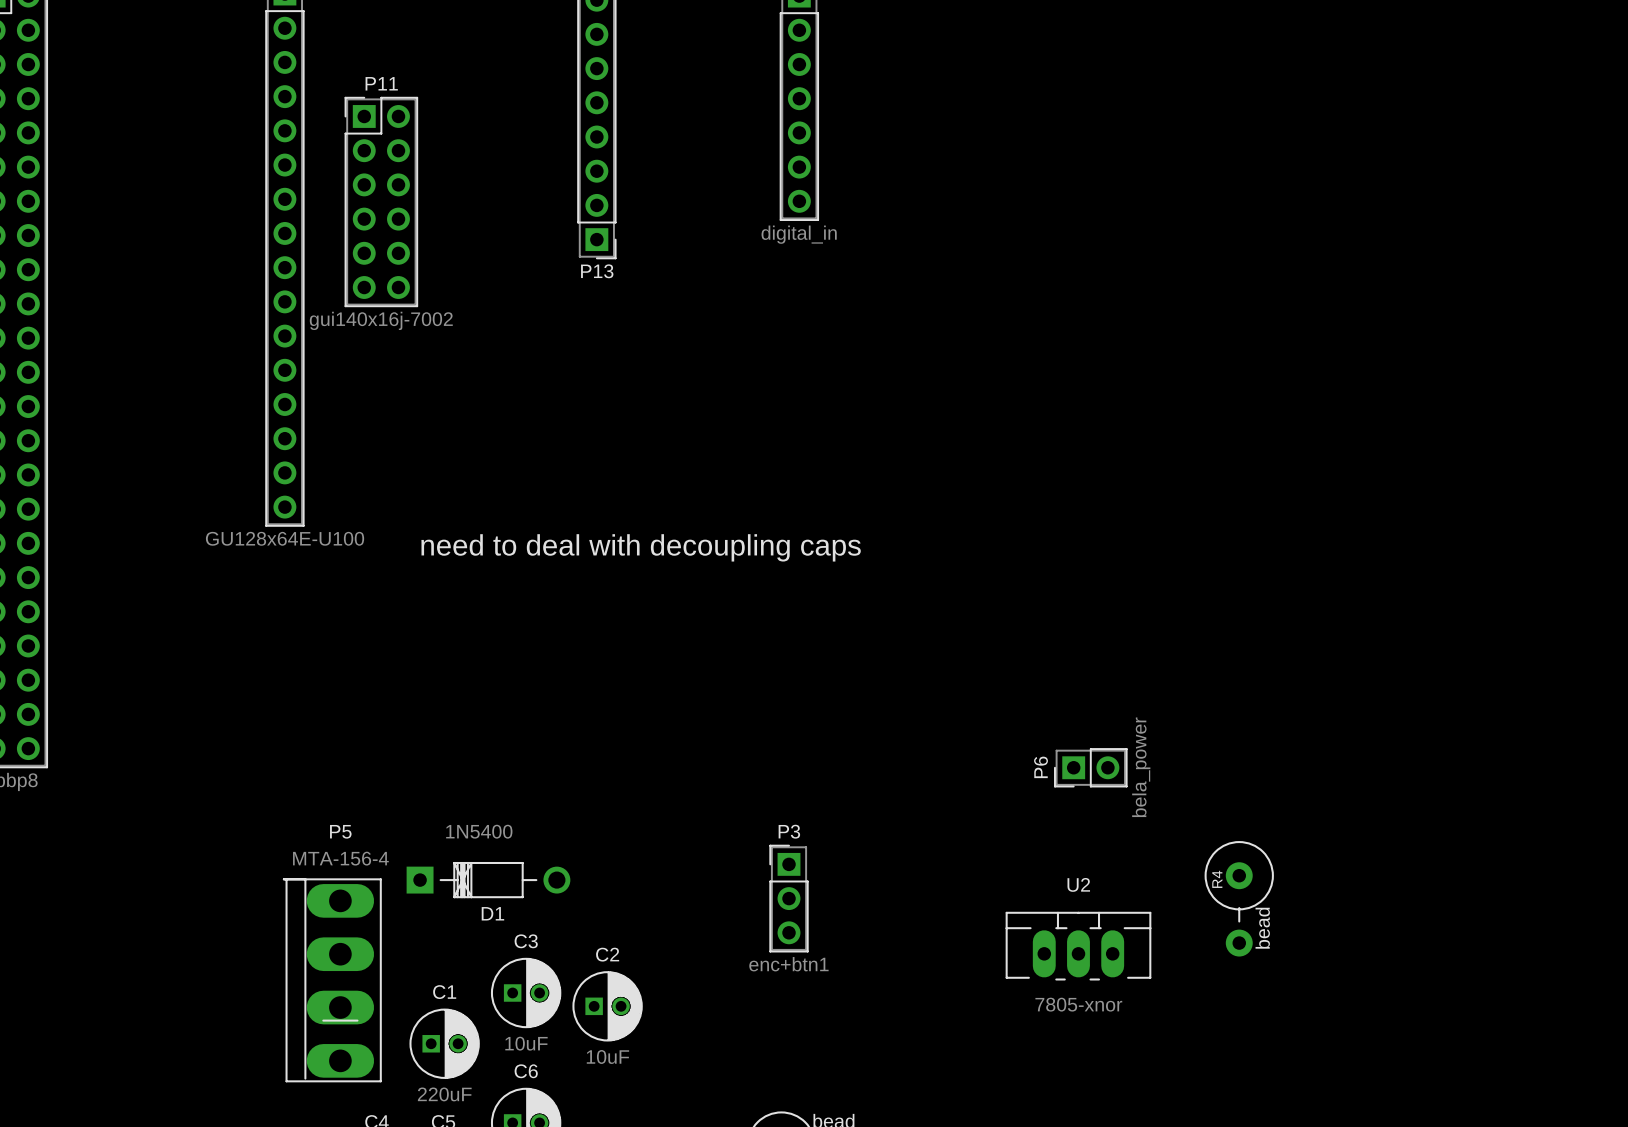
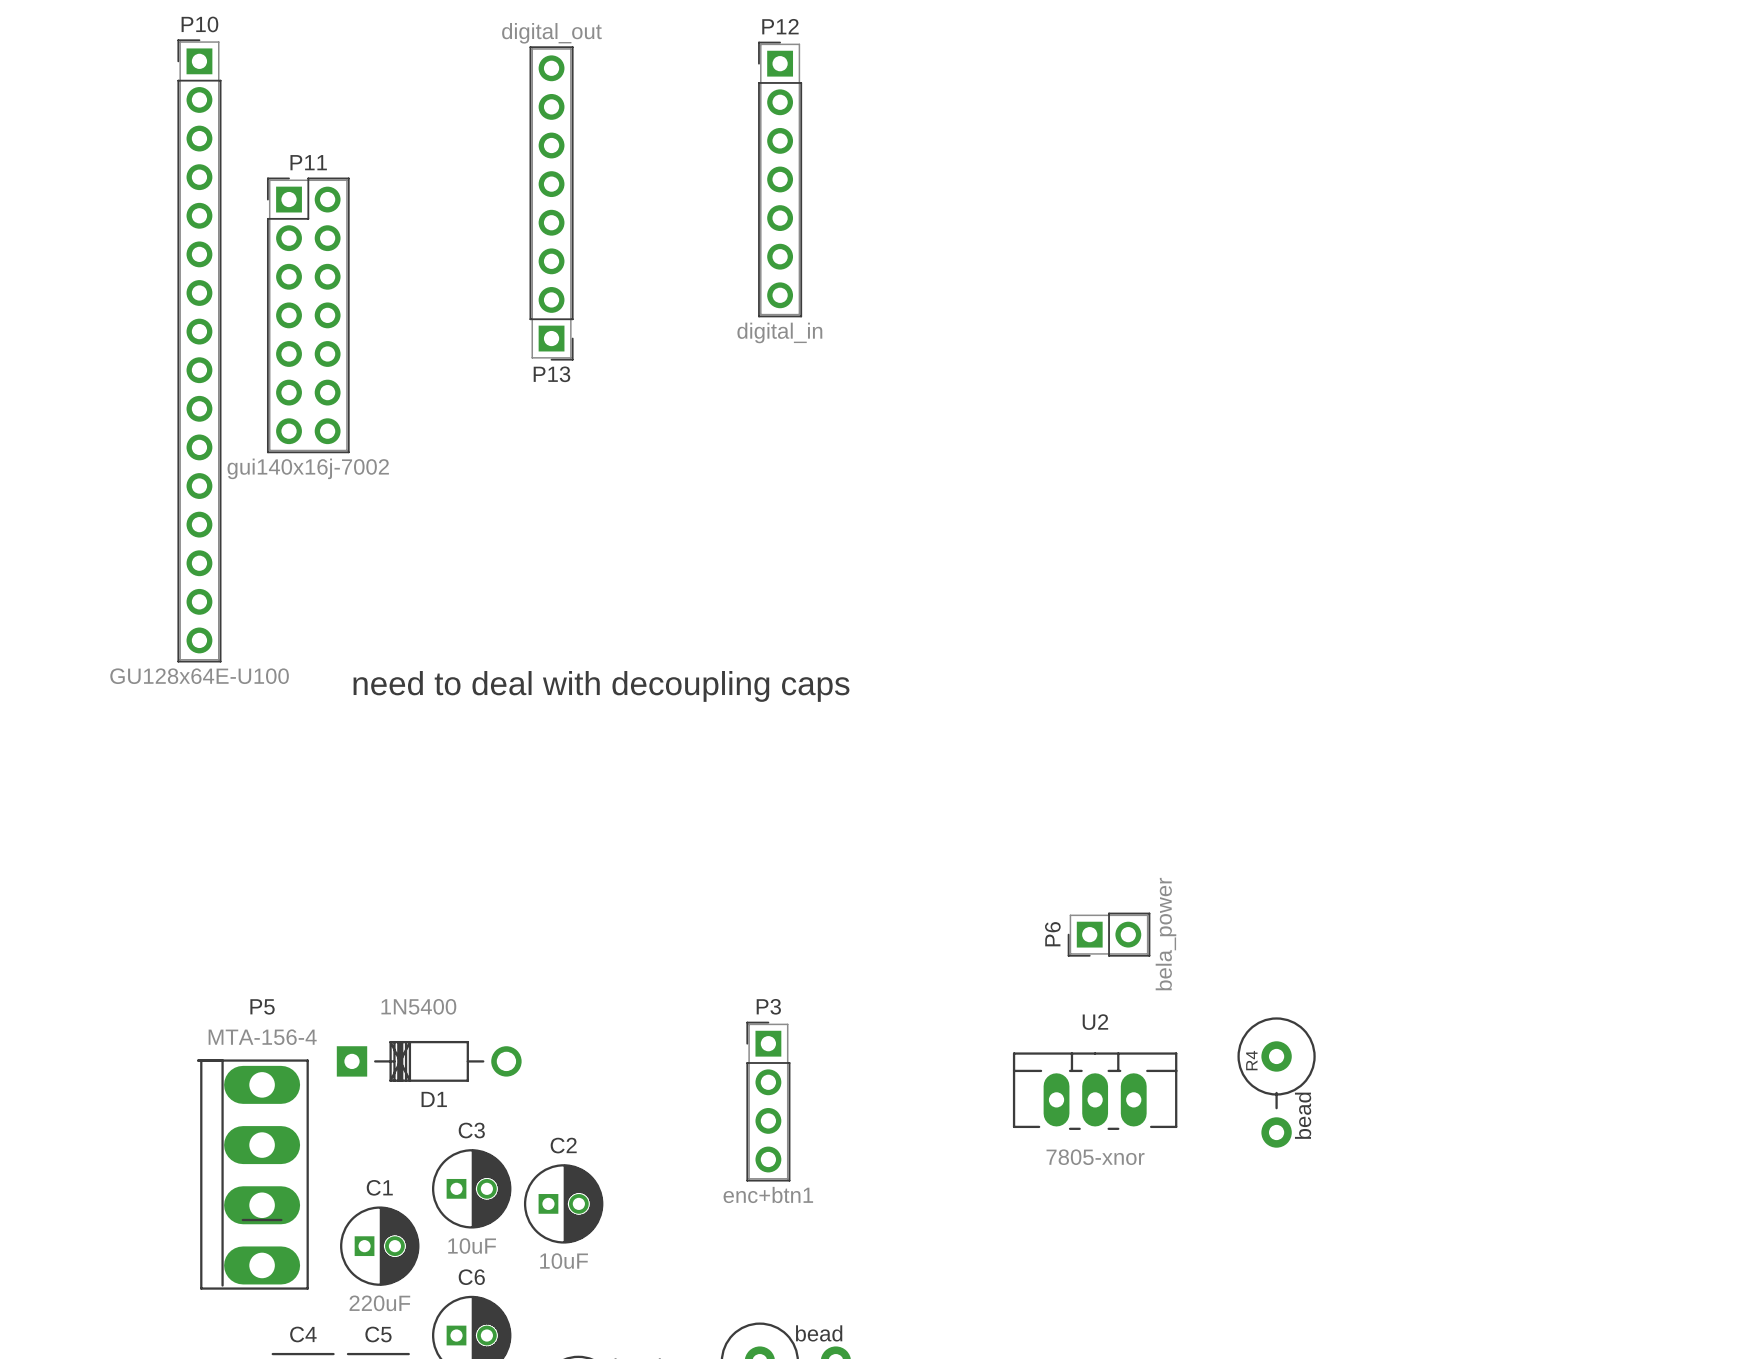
P11 footprint: [344, 96, 419, 308] -> [266, 177, 350, 454]
P3 footprint: [769, 844, 809, 953] -> [746, 1021, 791, 1182]
U2 position: (1078, 946) -> (1095, 1091)

